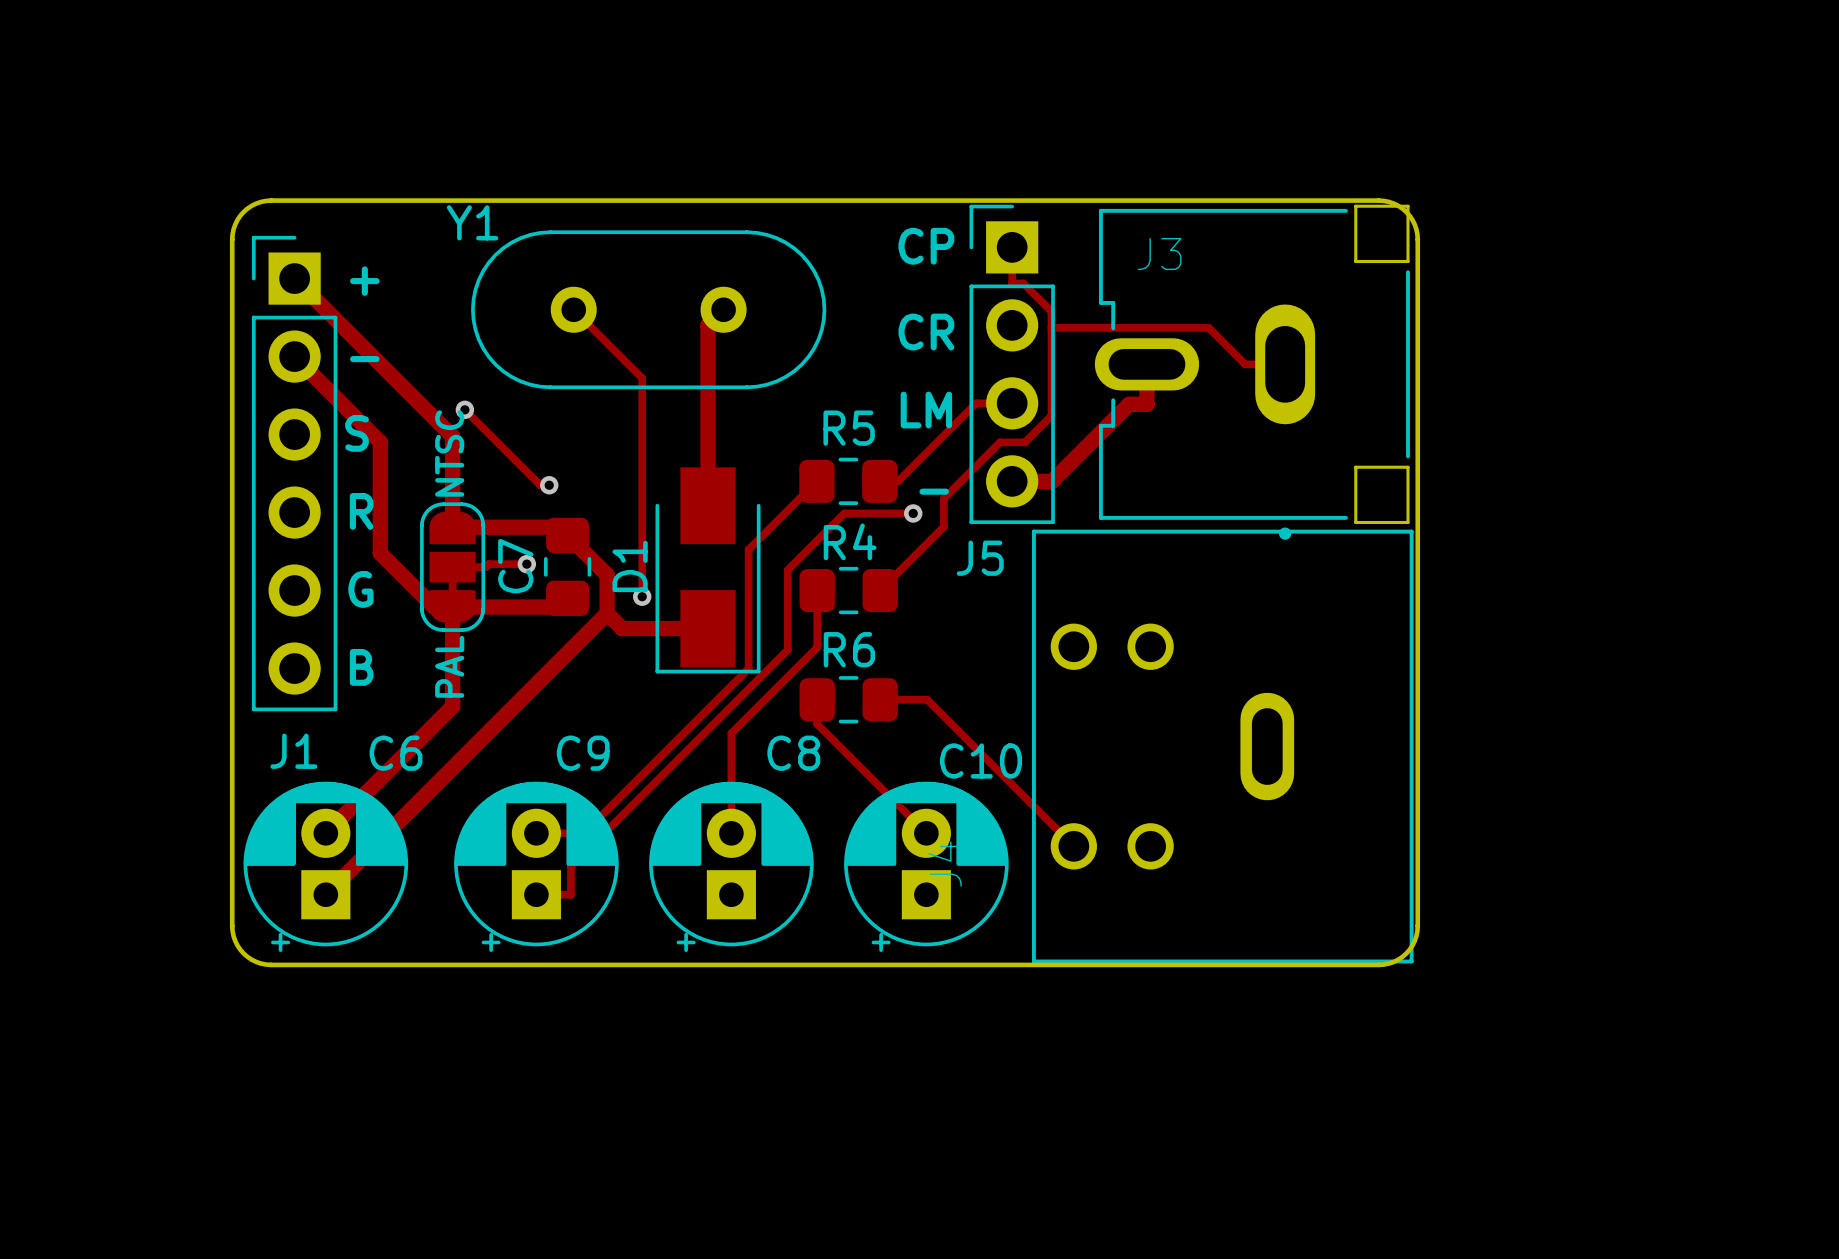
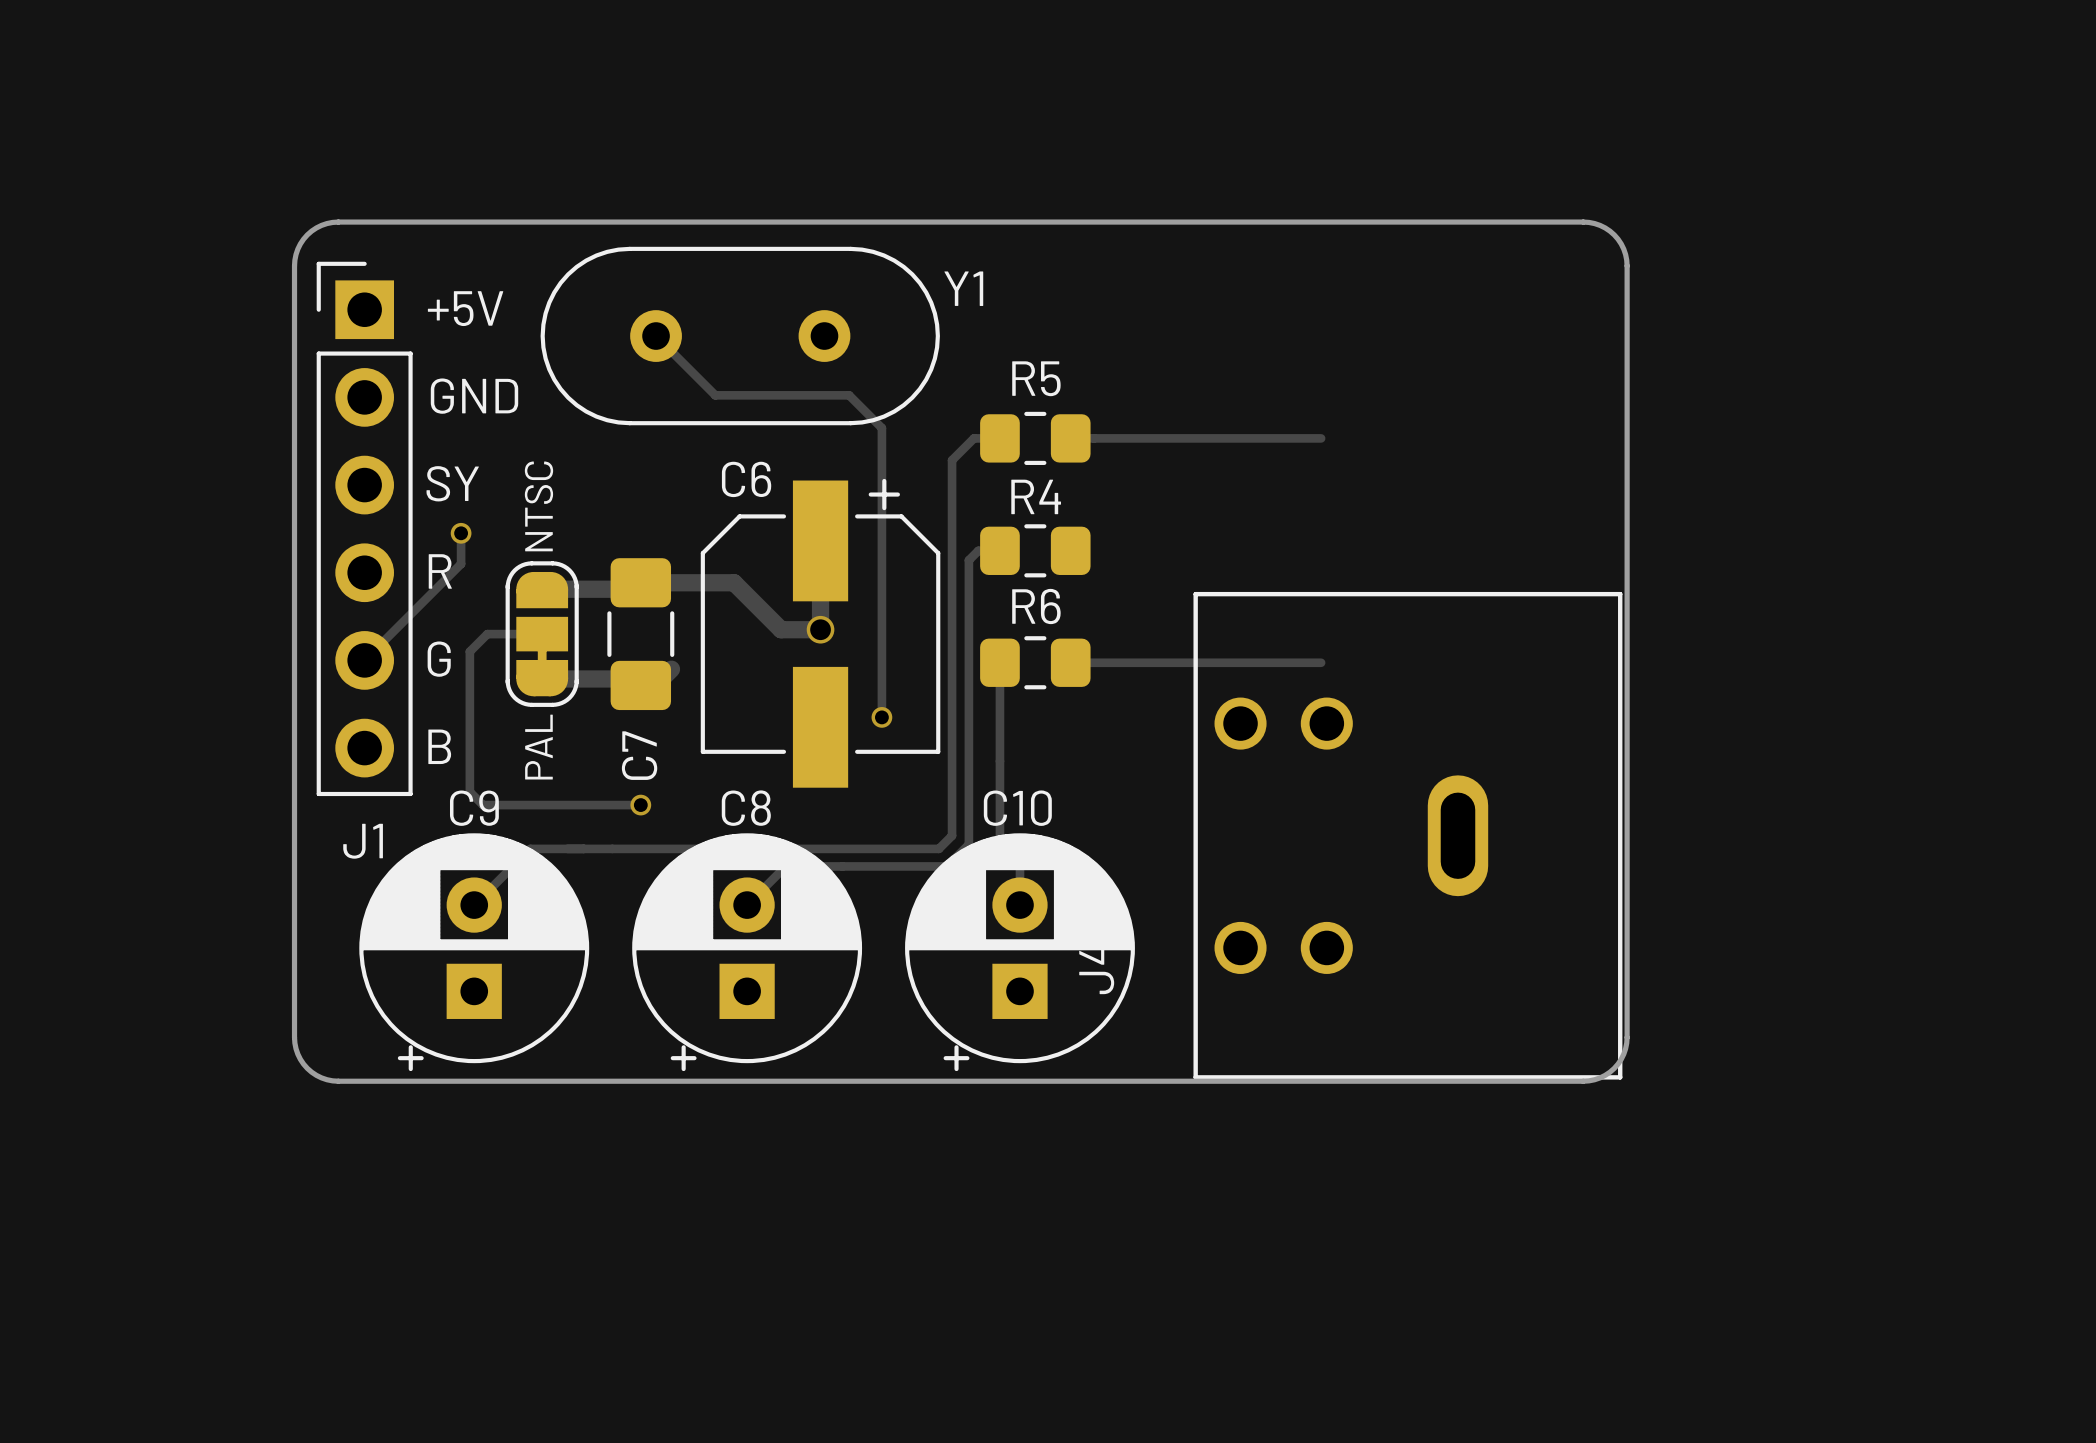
Y1 name position: Y1 (472, 222) -> Y1 (963, 288)
text: CP (926, 246) -> none
track: (1012, 247) (1012, 283) (1023, 283) (1051, 311) (1051, 415) (1024, 442) (1000, 442) (943, 498) (943, 526) (880, 590) -> none
track: (294, 278) (452, 436) (452, 527) -> none
text: + (364, 281) -> +5V (465, 308)
track: none -> (656, 336) (715, 395) (849, 395) (881, 428) (881, 717)
track: (573, 309) (642, 378) (642, 596) -> none
Y1 position: (648, 309) -> (740, 336)
track: (723, 309) (708, 325) (708, 505) -> none
track: (1051, 327) (1208, 327) (1245, 364) (1285, 364) -> none
text: CR (926, 332) -> none
track: (294, 356) (380, 442) (380, 477) -> none
text: - (364, 359) -> GND (474, 396)
J5: (1012, 364) -> none
track: (1146, 364) (1146, 404) (1129, 404) (1052, 481) (1012, 481) -> none
J3: (1252, 372) -> none
track: none -> (999, 438) (973, 438) (952, 460) (952, 660)
track: none -> (1070, 438) (1321, 438)
track: (1012, 403) (976, 403) (898, 481) (879, 481) -> none
track: (464, 409) (540, 485) (549, 485) -> none
via: (464, 409) -> none
text: LM (926, 410) -> none
text: S (357, 433) -> SY (452, 483)
track width: thick (380, 442) (380, 553) -> thin (460, 493) (460, 618)
via: none -> (461, 533)
track: (816, 481) (748, 549) (748, 668) (583, 833) (536, 833) -> none
R5 position: (848, 481) -> (1035, 438)
via: (549, 485) -> none
text: - (934, 491) -> none
track: none -> (999, 550) (978, 550) (968, 560) (968, 844) (947, 866) (785, 866) (747, 905)
track: (380, 504) (380, 553) (434, 607) (452, 607) (452, 706) (325, 833) -> (461, 563) (364, 660)
track: (913, 513) (844, 513) (787, 569) (787, 649) (570, 866) (570, 894) (536, 894) -> none
via: (913, 513) -> none
C7 footprint: [543, 517, 592, 617] -> [607, 558, 675, 711]
track: (534, 527) (559, 527) (607, 574) (607, 613) -> (634, 589) (640, 582) (734, 582) (781, 629) (820, 629) (820, 540)
via: none -> (820, 629)
track: (526, 564) (488, 564) (485, 567) (452, 567) -> (640, 805) (483, 805) (469, 791) (469, 651) (487, 634) (542, 634)
via: (526, 564) -> none
C7 name position: C7 (515, 566) -> C7 (639, 755)
D1: (708, 570) -> none
R4 position: (848, 590) -> (1035, 550)
track: none -> (999, 662) (999, 845) (1019, 866) (1019, 905)
track: none -> (1070, 662) (1321, 662)
via: (642, 596) -> none
track: (607, 613) (622, 628) (708, 628) -> none
track: (607, 613) (325, 894) -> none
via: none -> (881, 717)
track: (817, 647) (731, 733) (731, 833) -> (952, 724) (952, 783)
R6 position: (848, 699) -> (1035, 662)
track: (880, 699) (927, 699) (1073, 846) -> none
via: none -> (640, 805)
track: (817, 724) (926, 833) -> (952, 810) (952, 835) (938, 848) (530, 848) (474, 905)
C6 name position: C6 (396, 753) -> C6 (746, 479)
C8 name position: C8 (793, 753) -> C8 (746, 808)
C6 footprint: [243, 781, 409, 952] -> [700, 478, 941, 788]
C9 footprint: [454, 781, 619, 952] -> [359, 833, 590, 1072]
C8 footprint: [649, 781, 814, 952] -> [632, 833, 863, 1072]
C10 footprint: [844, 781, 1009, 952] -> [905, 833, 1135, 1072]

